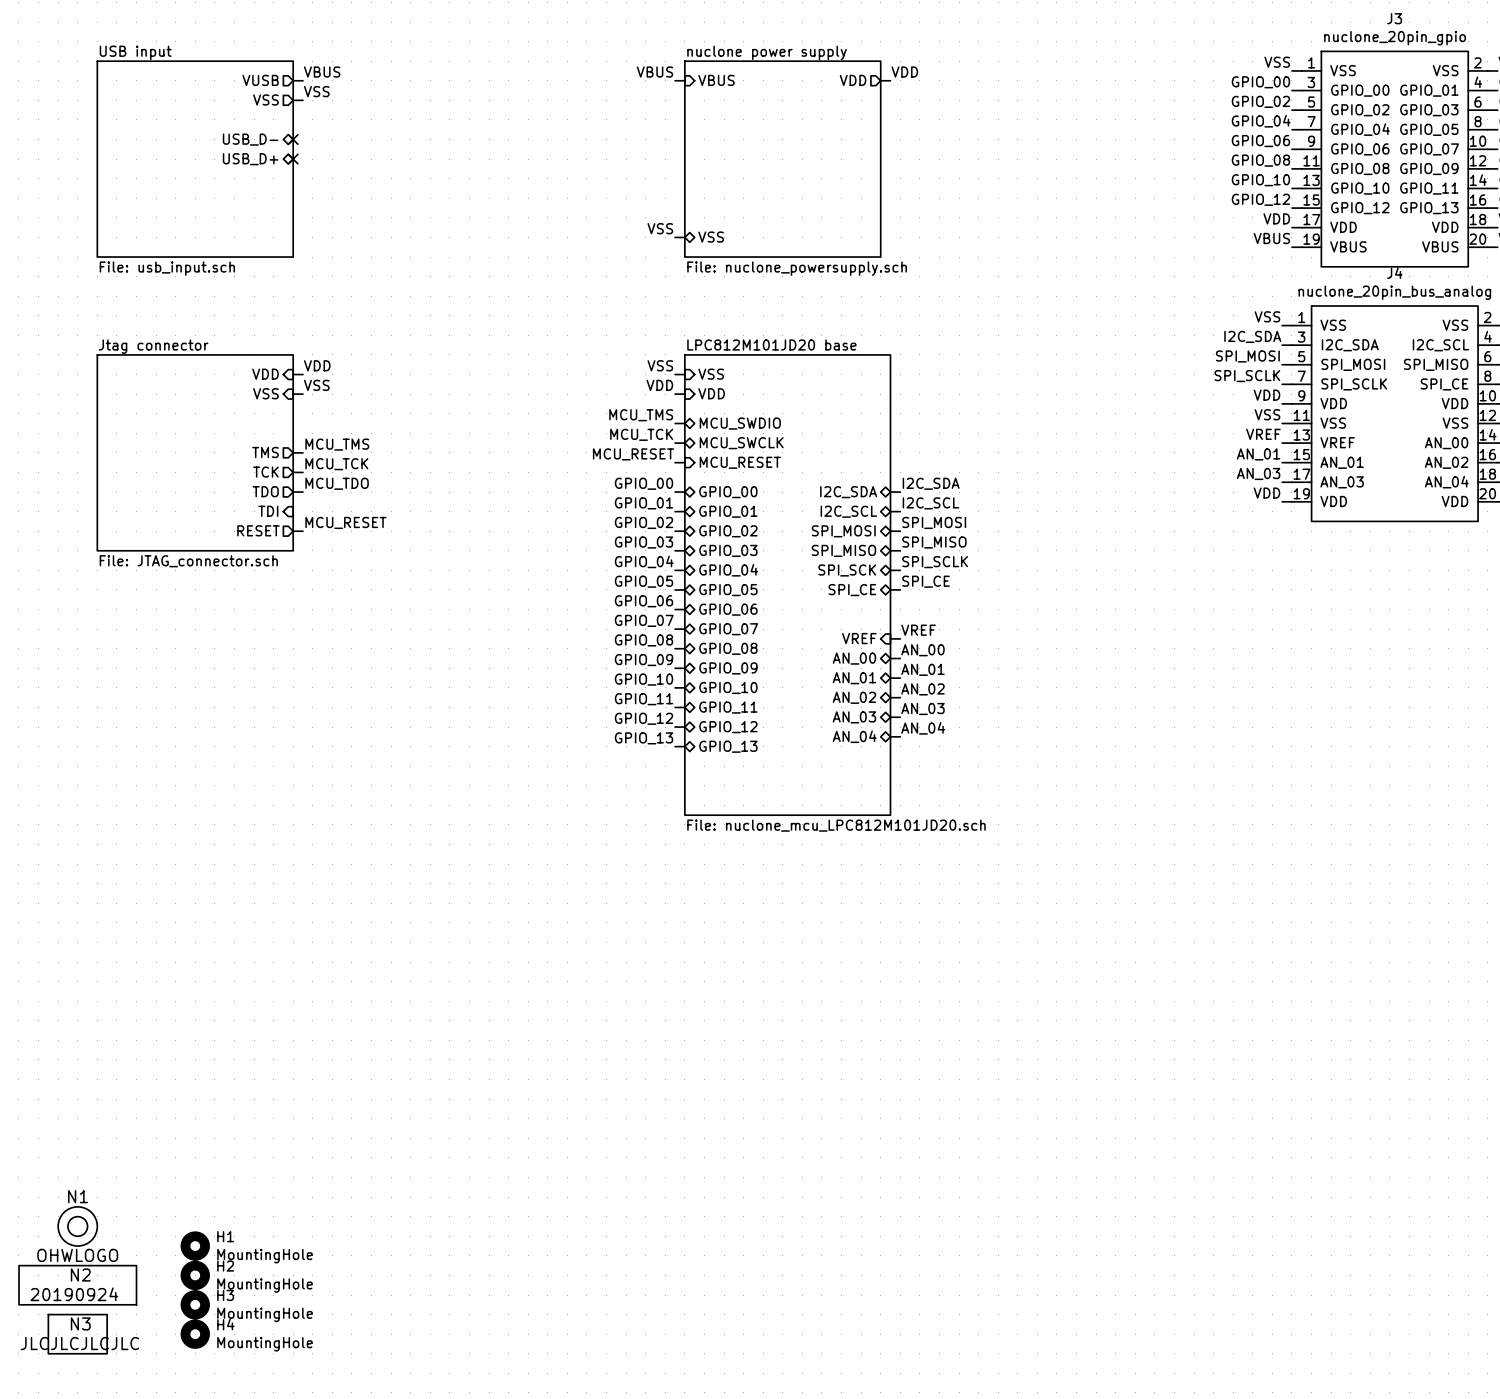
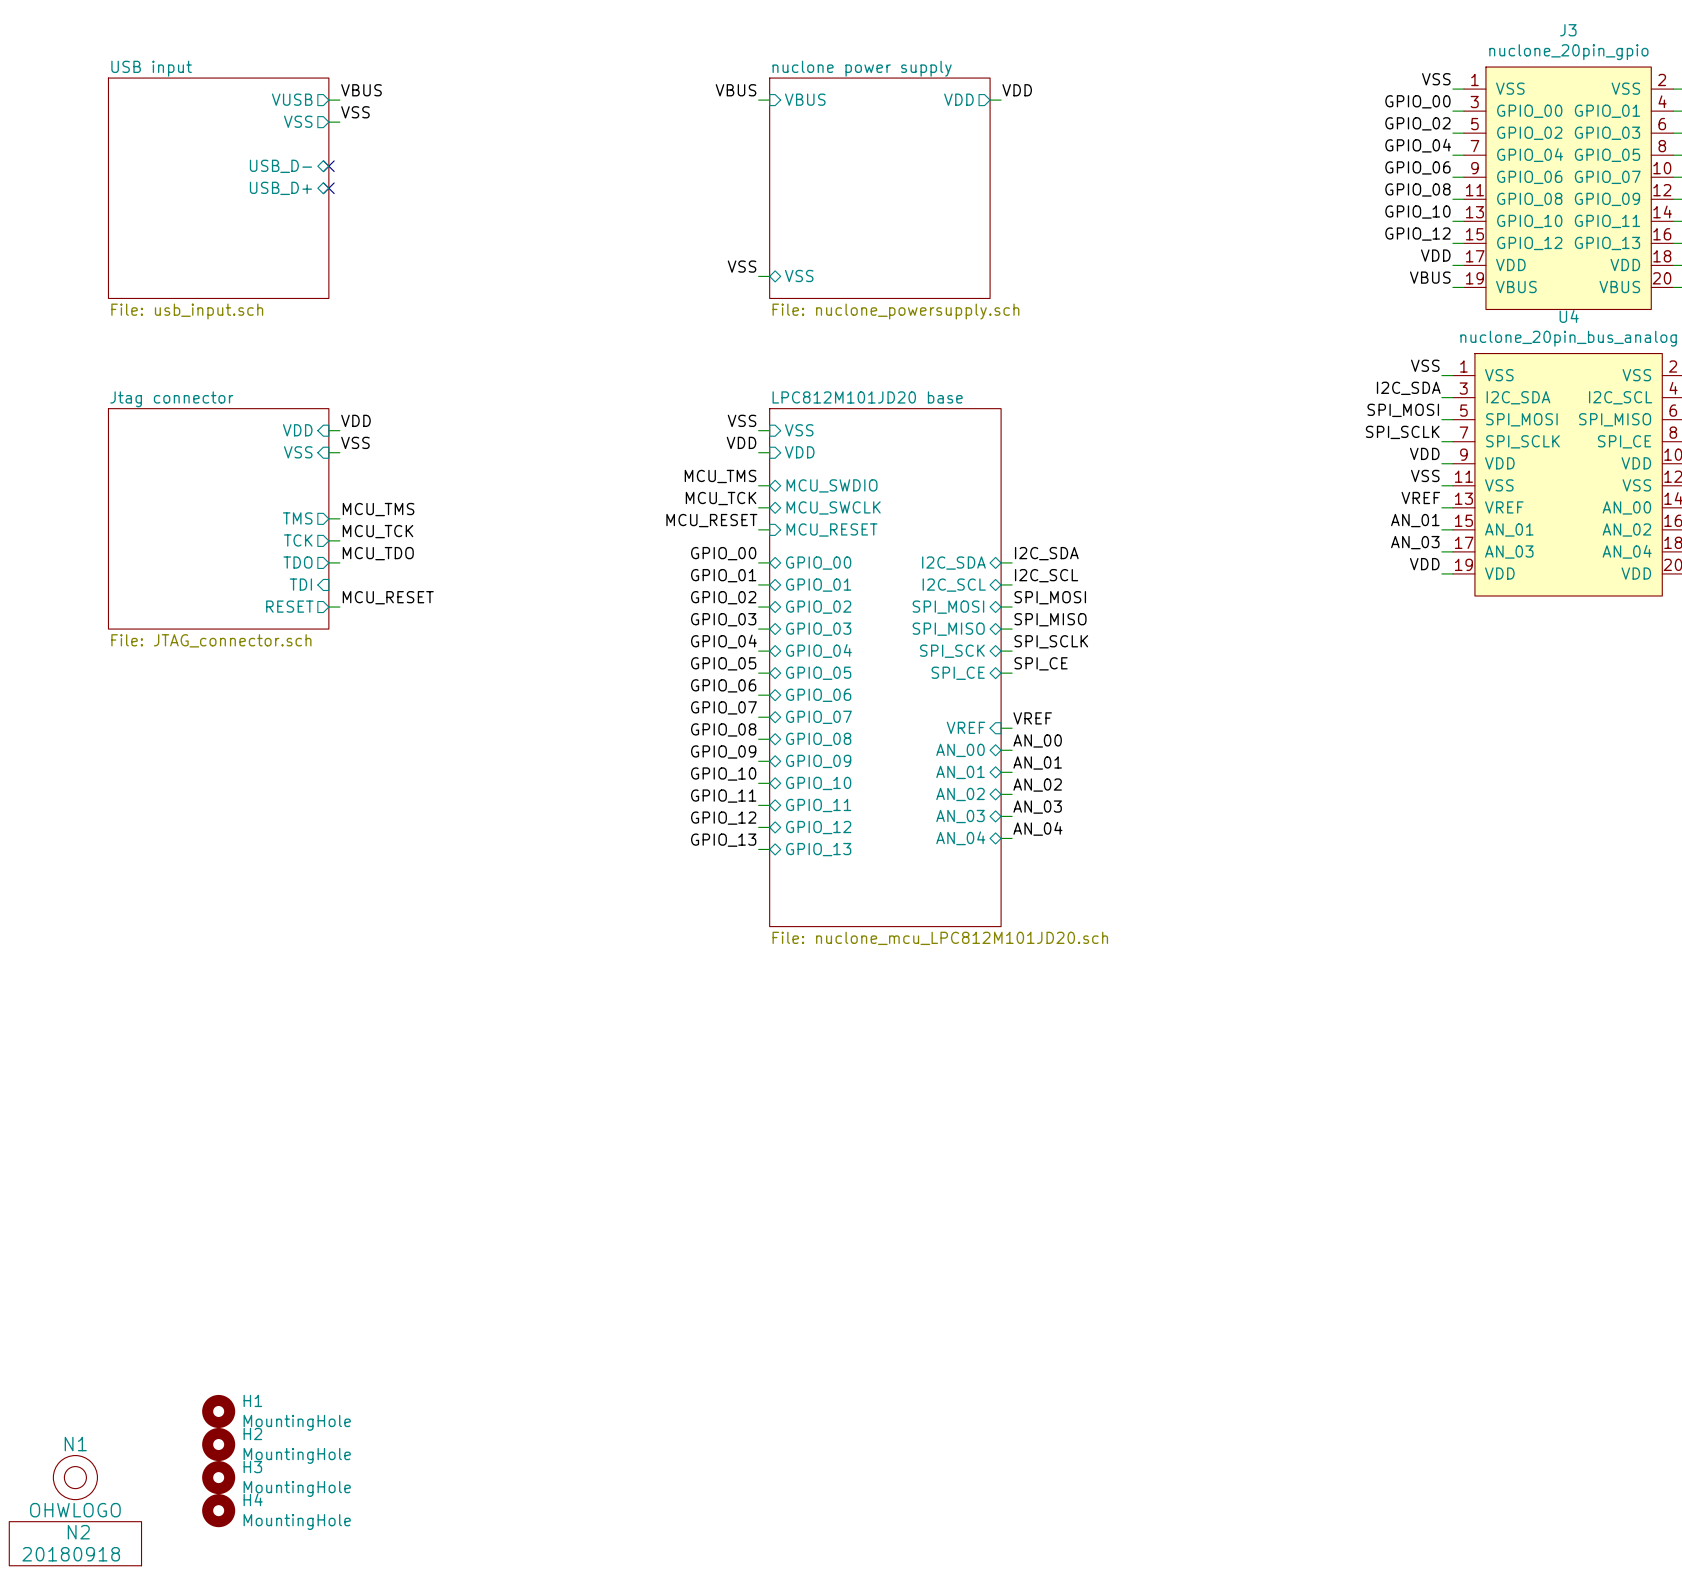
J4 name: J4 (1394, 273) -> U4 (1569, 316)
N1 position: (77, 1226) -> (75, 1477)
N2 position: (77, 1285) -> (75, 1543)
N2 value: 20190924 (74, 1294) -> 20180918 (71, 1554)
N3: JLCJLCJLCJLC (77, 1334) -> none

